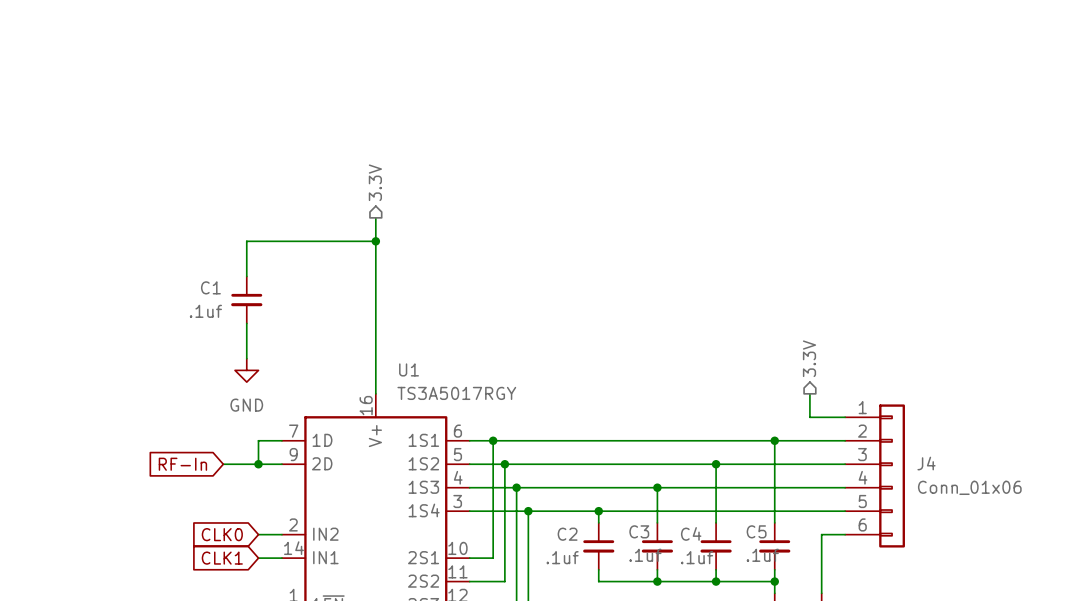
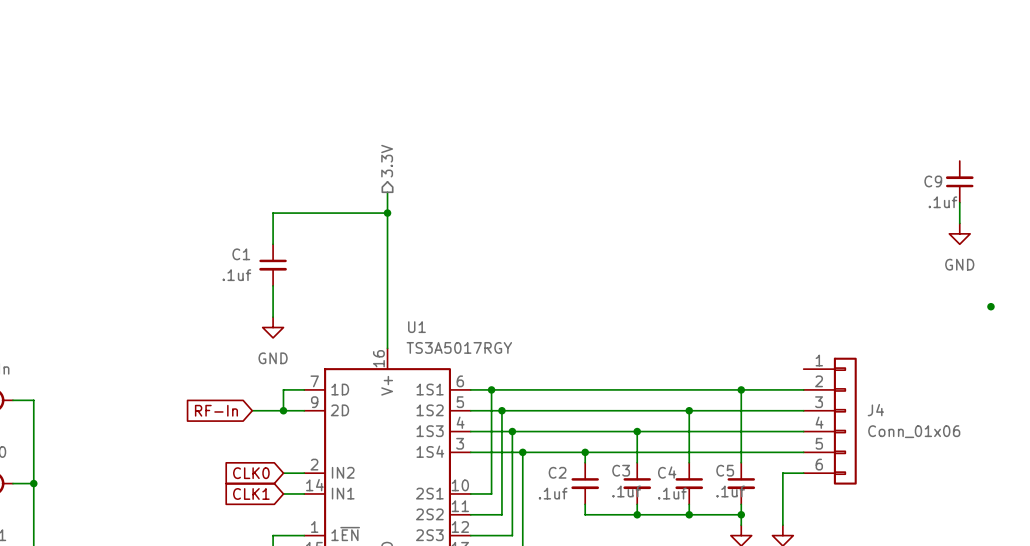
C9: none -> .1uf (959, 181)
wire: none -> (959, 202) (959, 223)
power symbol: none -> GND (959, 233)
junction: none -> (990, 306)
hierarchical label: 3.3V (809, 358) -> none
wire: (809, 393) (809, 417) (845, 417) -> none

